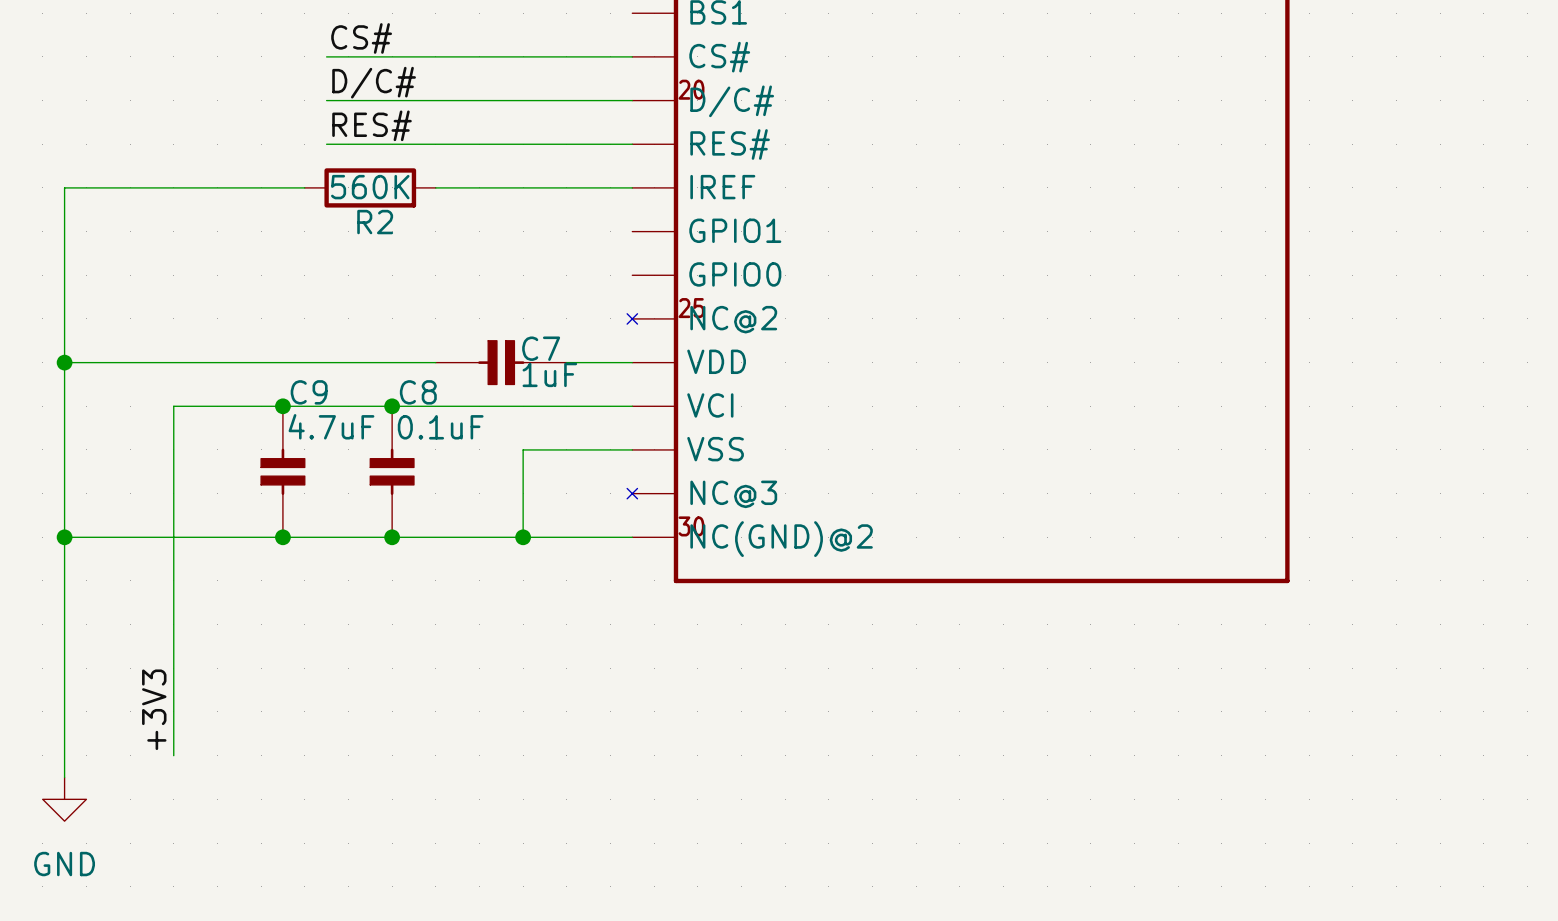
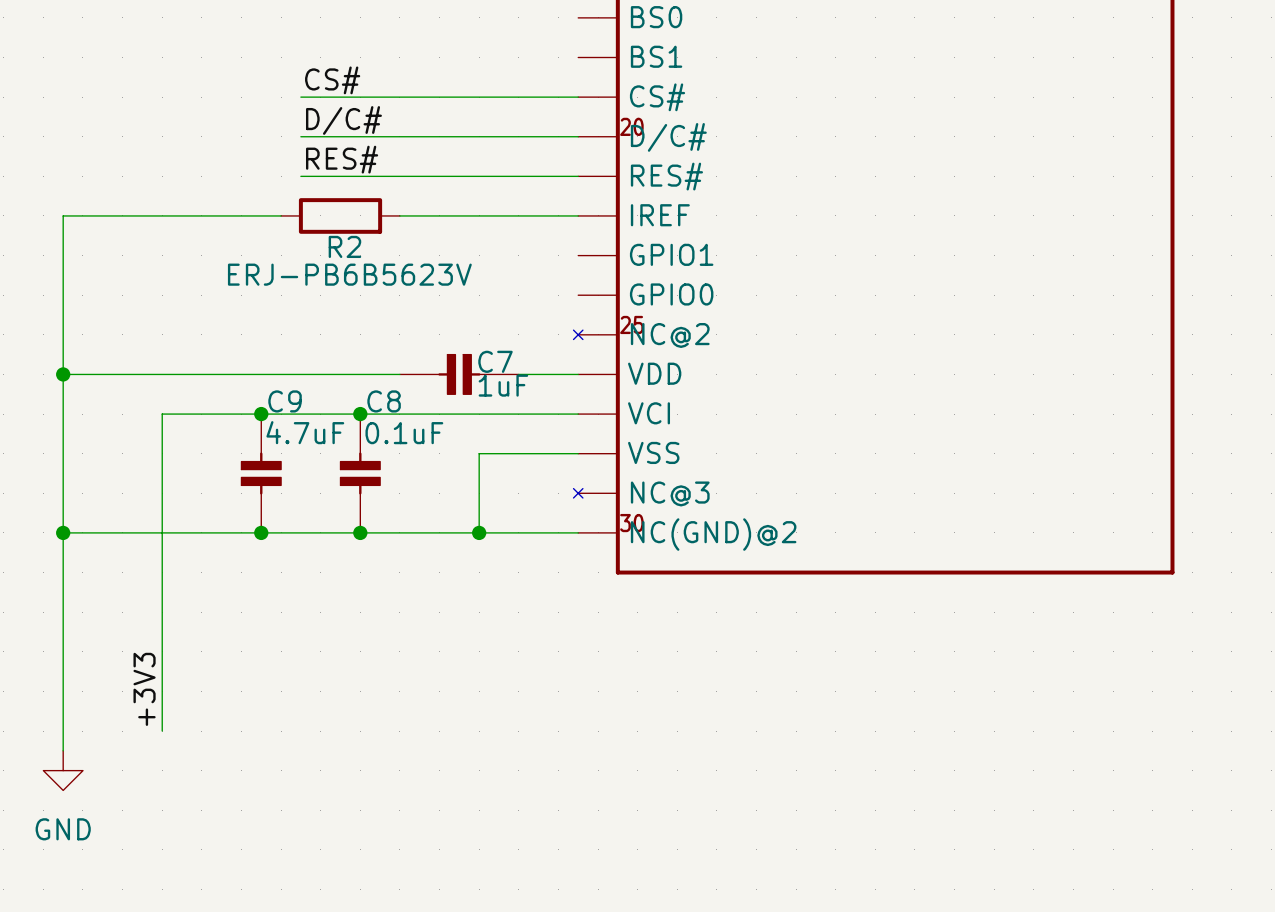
R2 value: 560K (370, 187) -> ERJ-PB6B5623V (349, 274)

